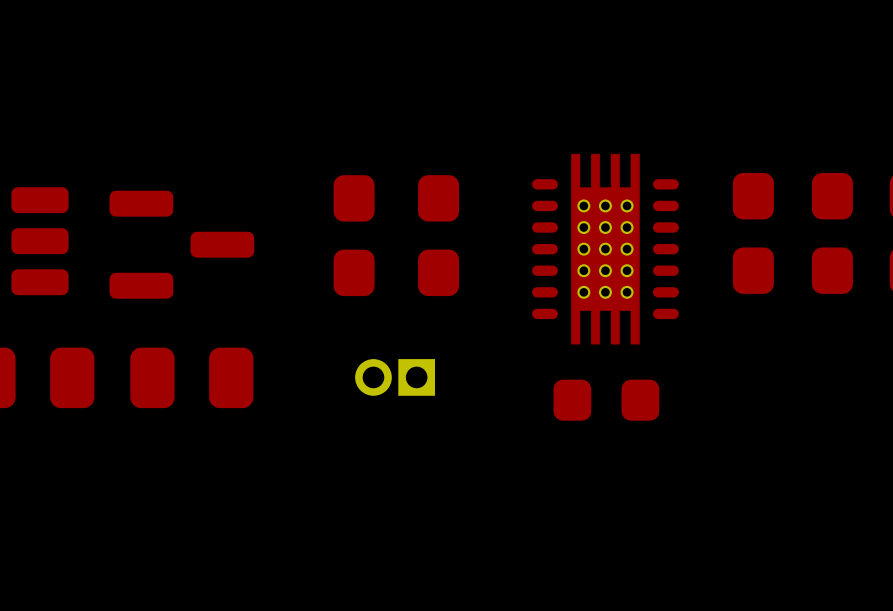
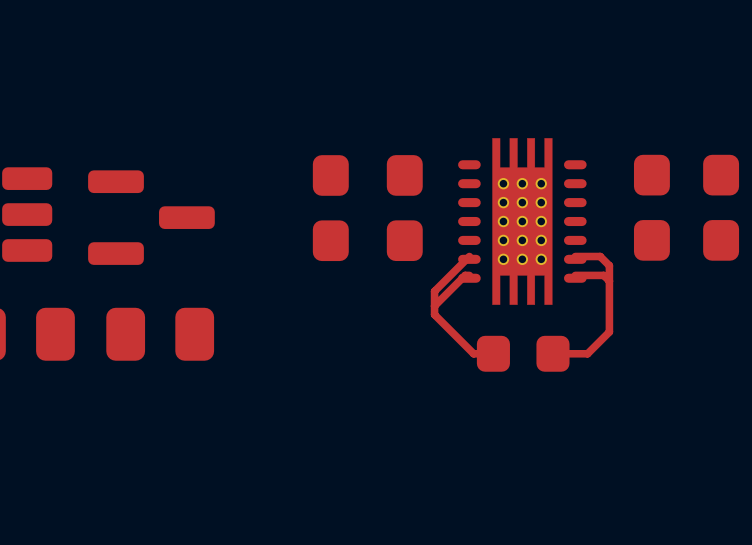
part: none -> (330, 208)
part: none -> (404, 208)
part: (354, 235) -> none
part: (438, 235) -> none
top track: none -> (469, 256) (434, 291) (434, 314) (473, 353) (493, 353)
top track: none -> (575, 256) (600, 256) (609, 265) (609, 331) (587, 353) (552, 353)
top track: none -> (469, 275) (465, 275) (434, 306)
top track: none -> (575, 275) (603, 275) (609, 281)
part: (395, 377) -> none

